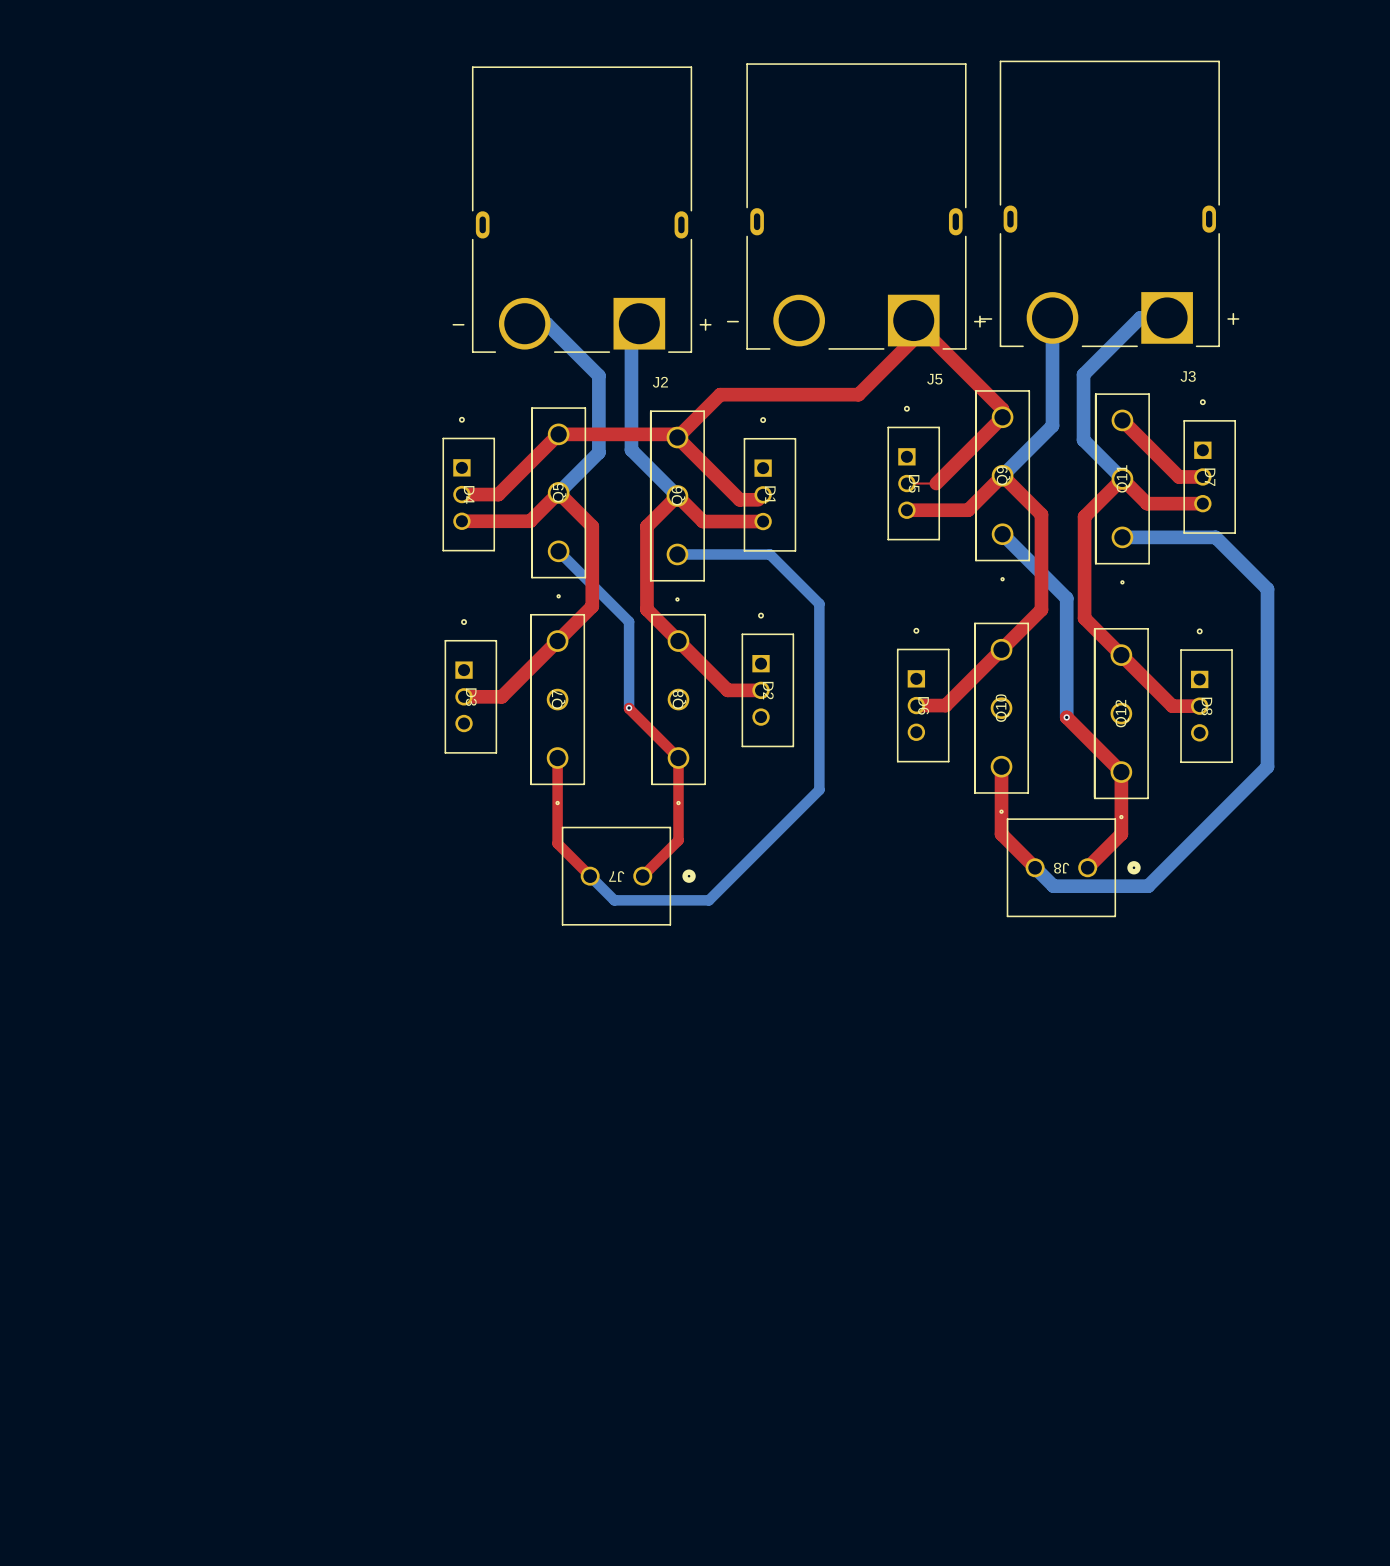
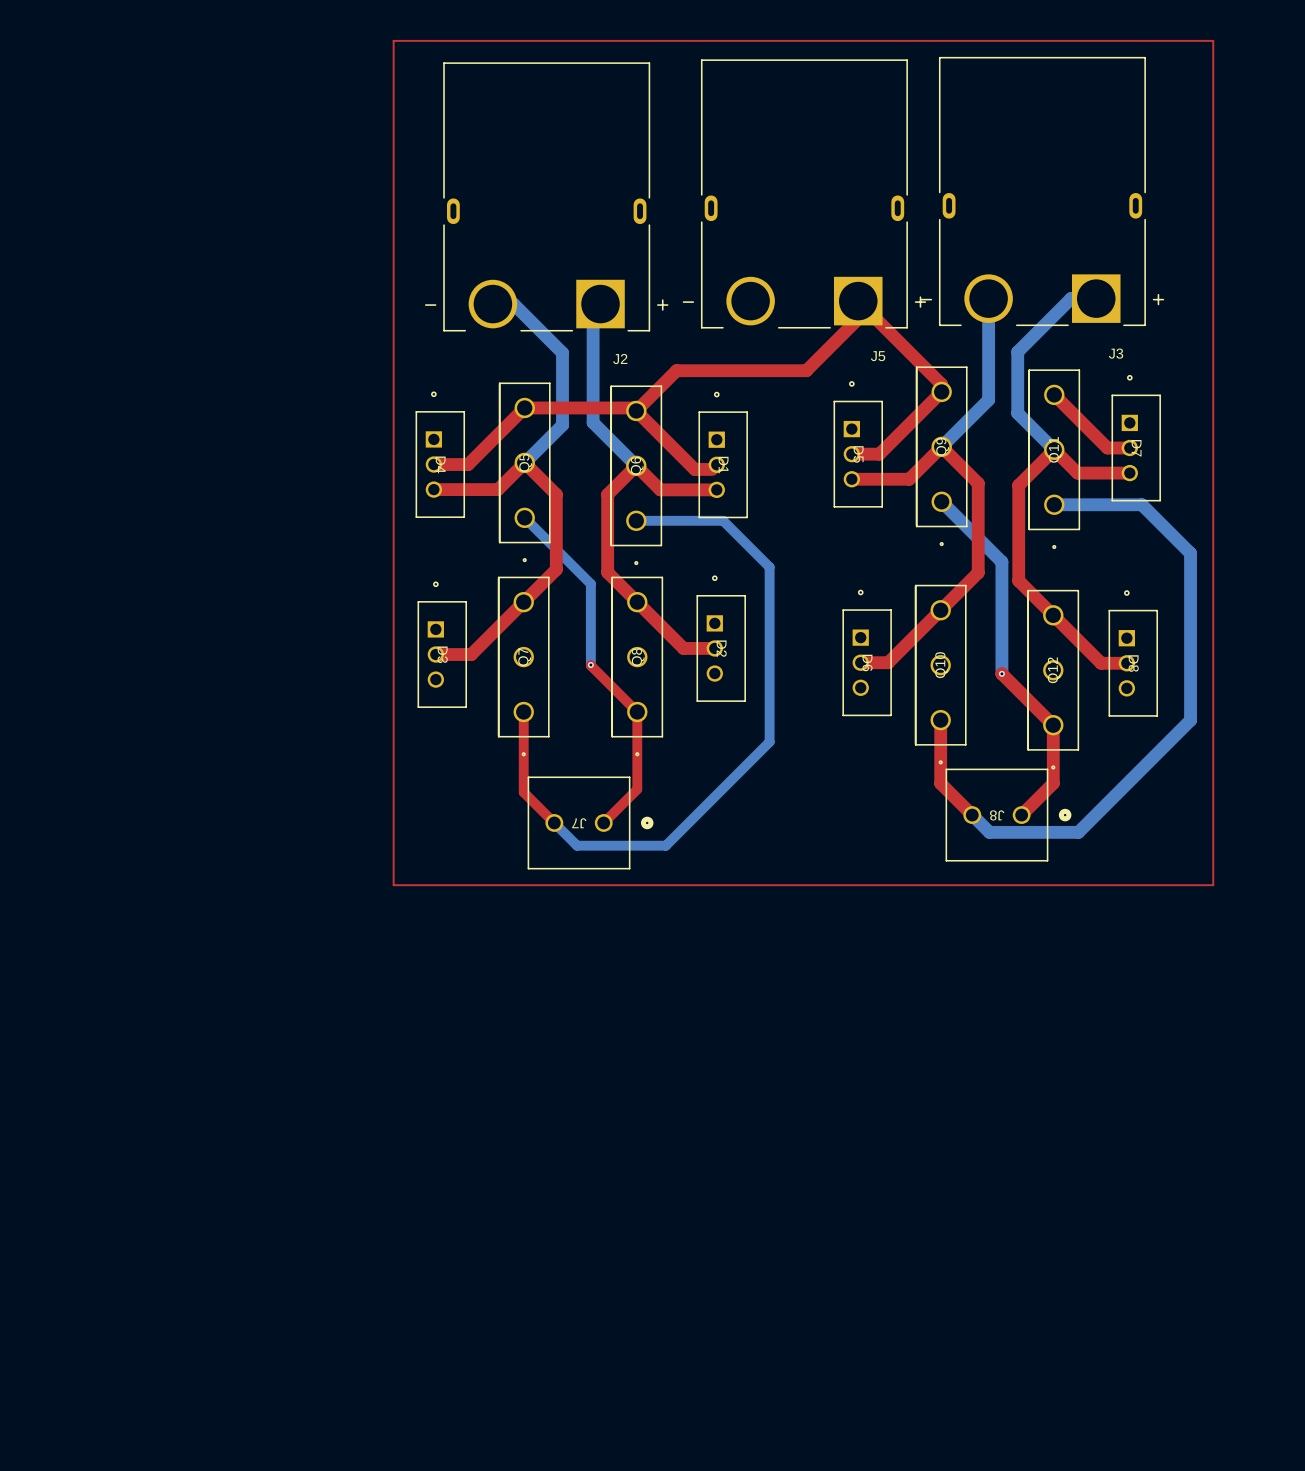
top track: none -> (393, 40) (1213, 40) (1213, 885) (393, 885) (393, 40)
top track width: thin (906, 483) (936, 483) -> thick (851, 454) (879, 454)

